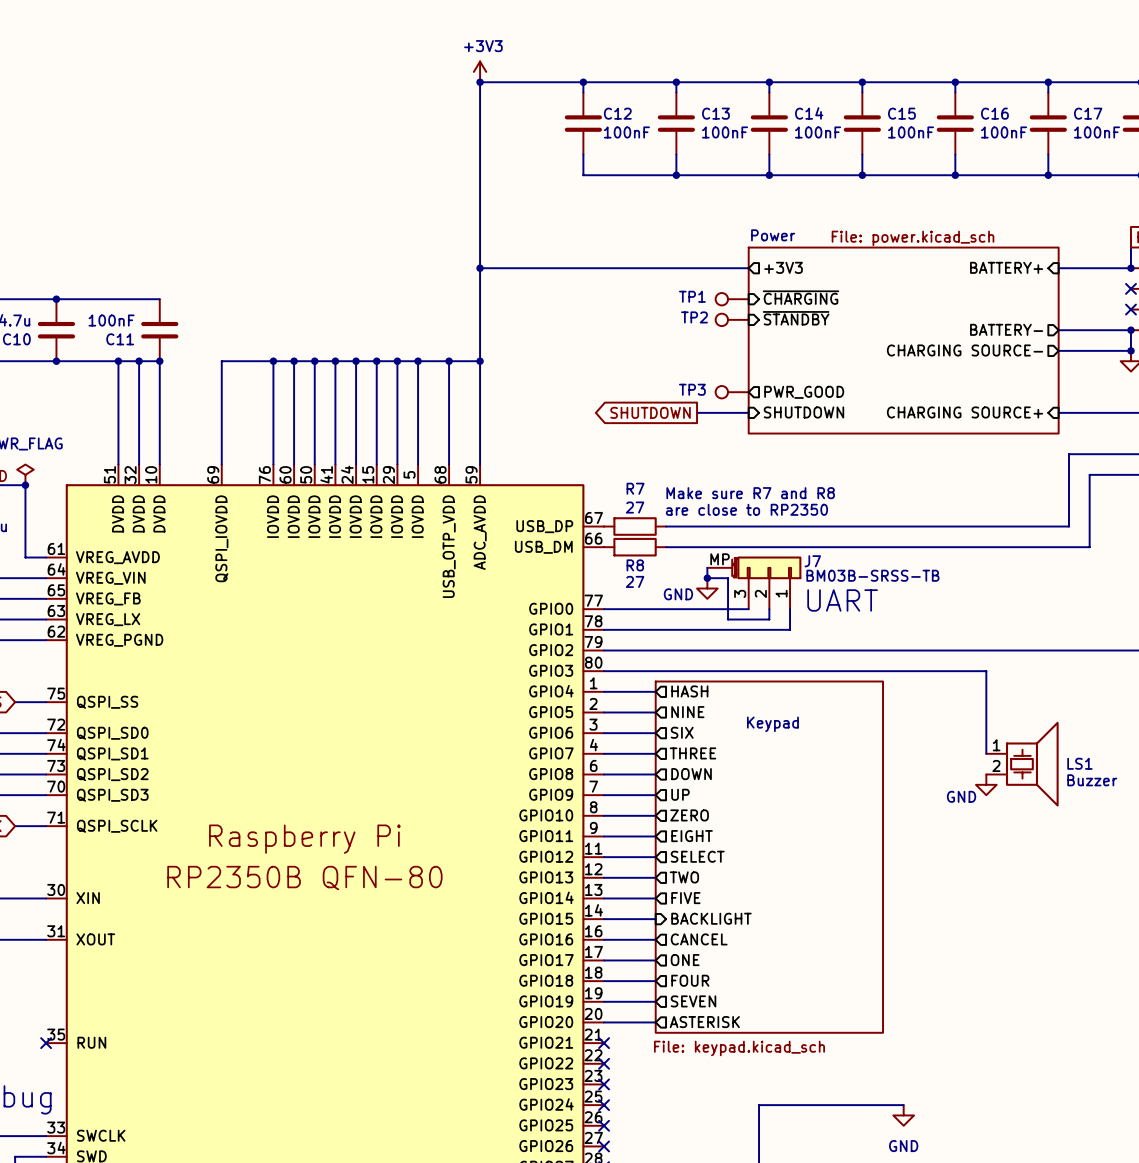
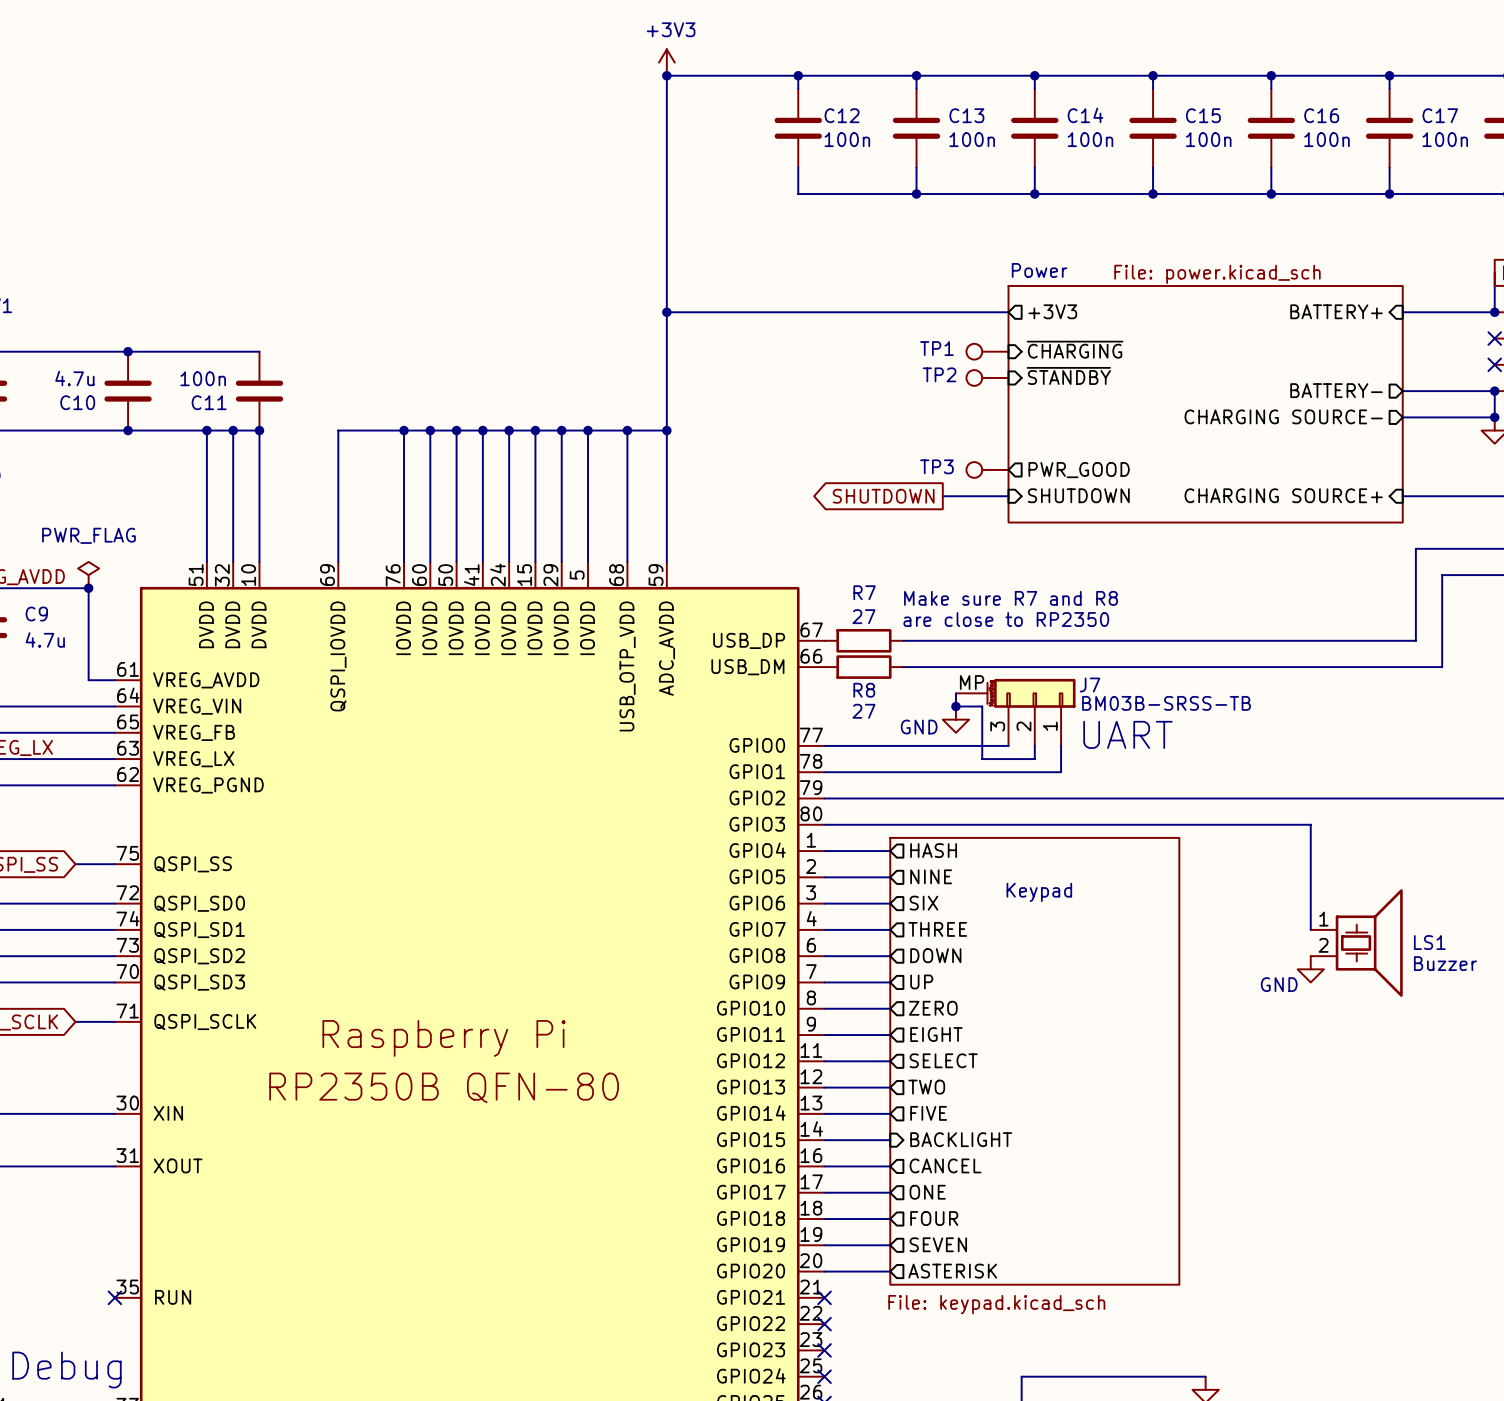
C12 value: 100nF (626, 132) -> 100n (847, 139)
C13 value: 100nF (725, 132) -> 100n (972, 139)
C14 value: 100nF (818, 132) -> 100n (1090, 139)
C15 value: 100nF (911, 132) -> 100n (1208, 139)
C16 value: 100nF (1004, 132) -> 100n (1327, 139)
C17 value: 100nF (1097, 132) -> 100n (1445, 139)
C11 value: 100nF (111, 320) -> 100n (203, 378)

